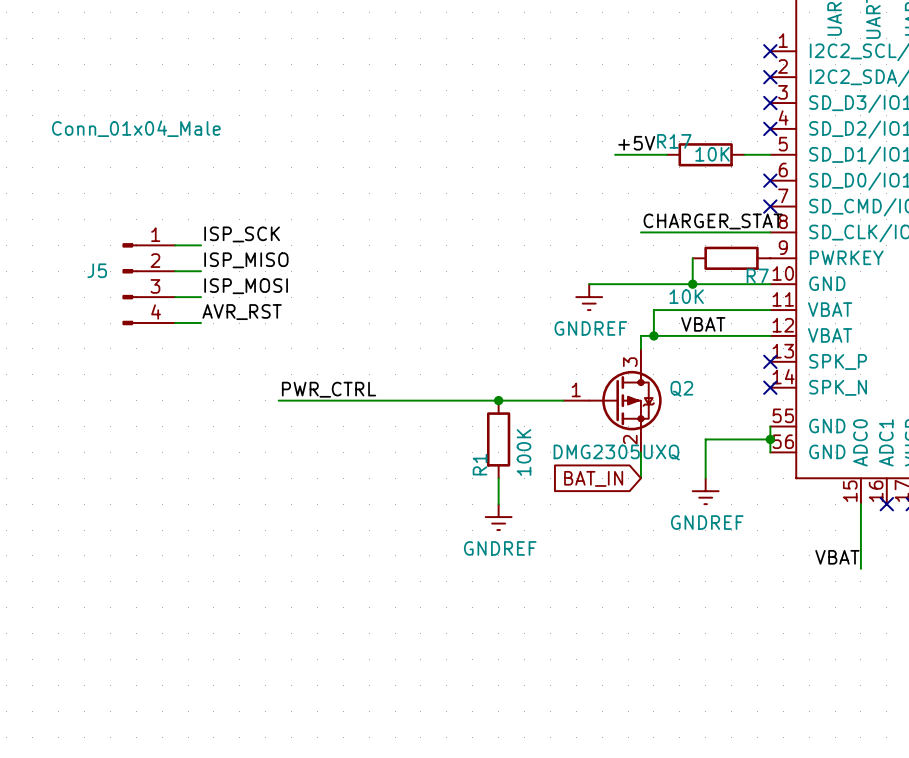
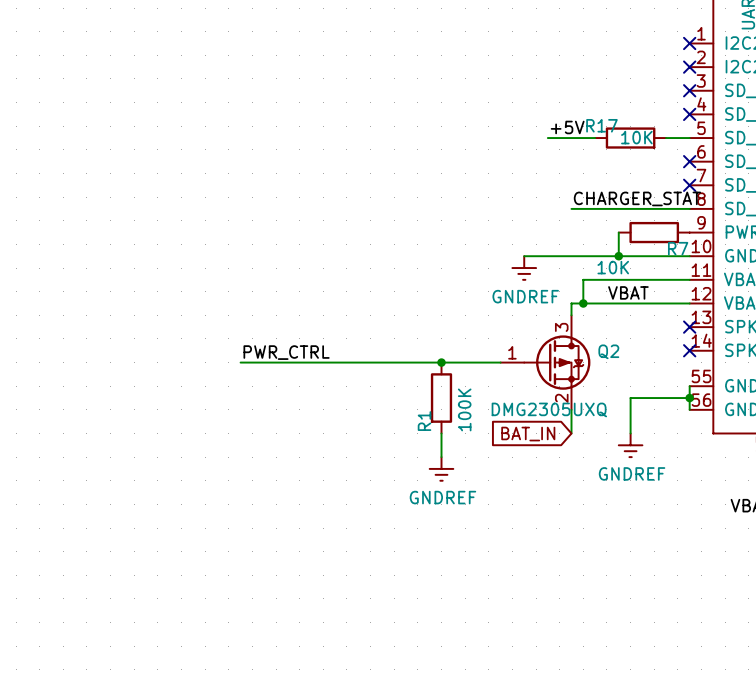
label: ISP_SCK (242, 234) -> none
wire: (175, 245) (201, 245) -> none
label: ISP_MISO (246, 260) -> none
wire: (175, 271) (201, 271) -> none
J5: Conn_01x04_Male (148, 284) -> none
label: ISP_MOSI (246, 286) -> none
wire: (175, 297) (201, 297) -> none
label: AVR_RST (242, 312) -> none
wire: (175, 323) (201, 323) -> none

